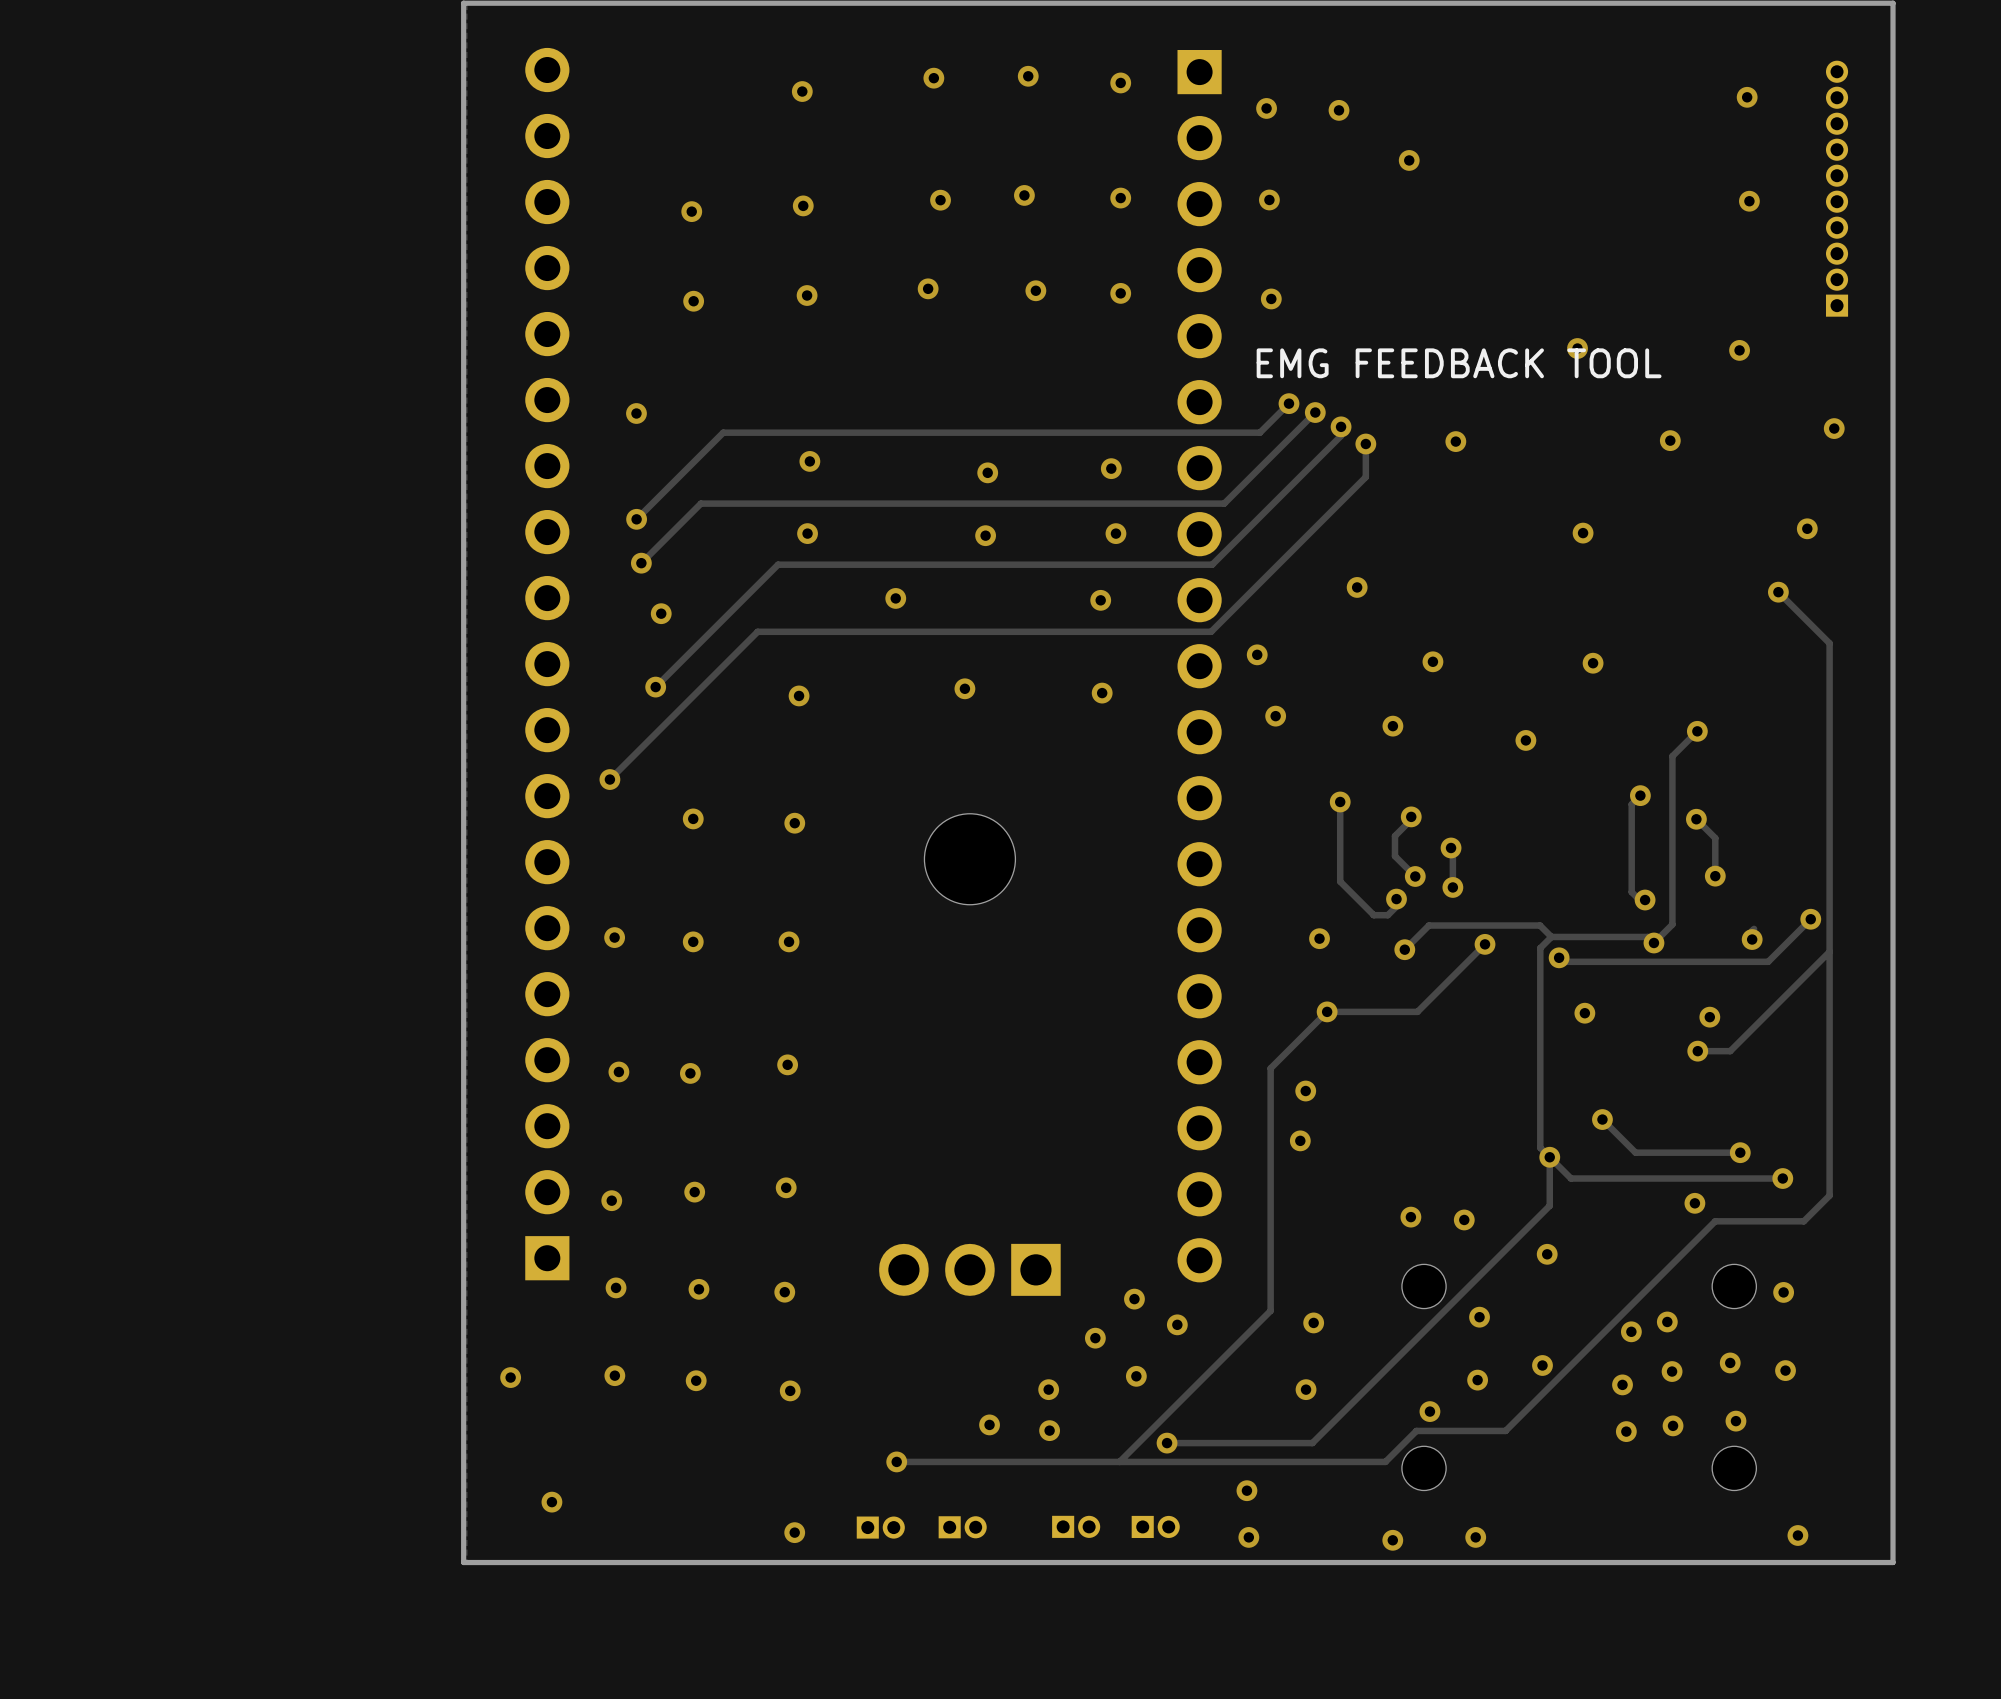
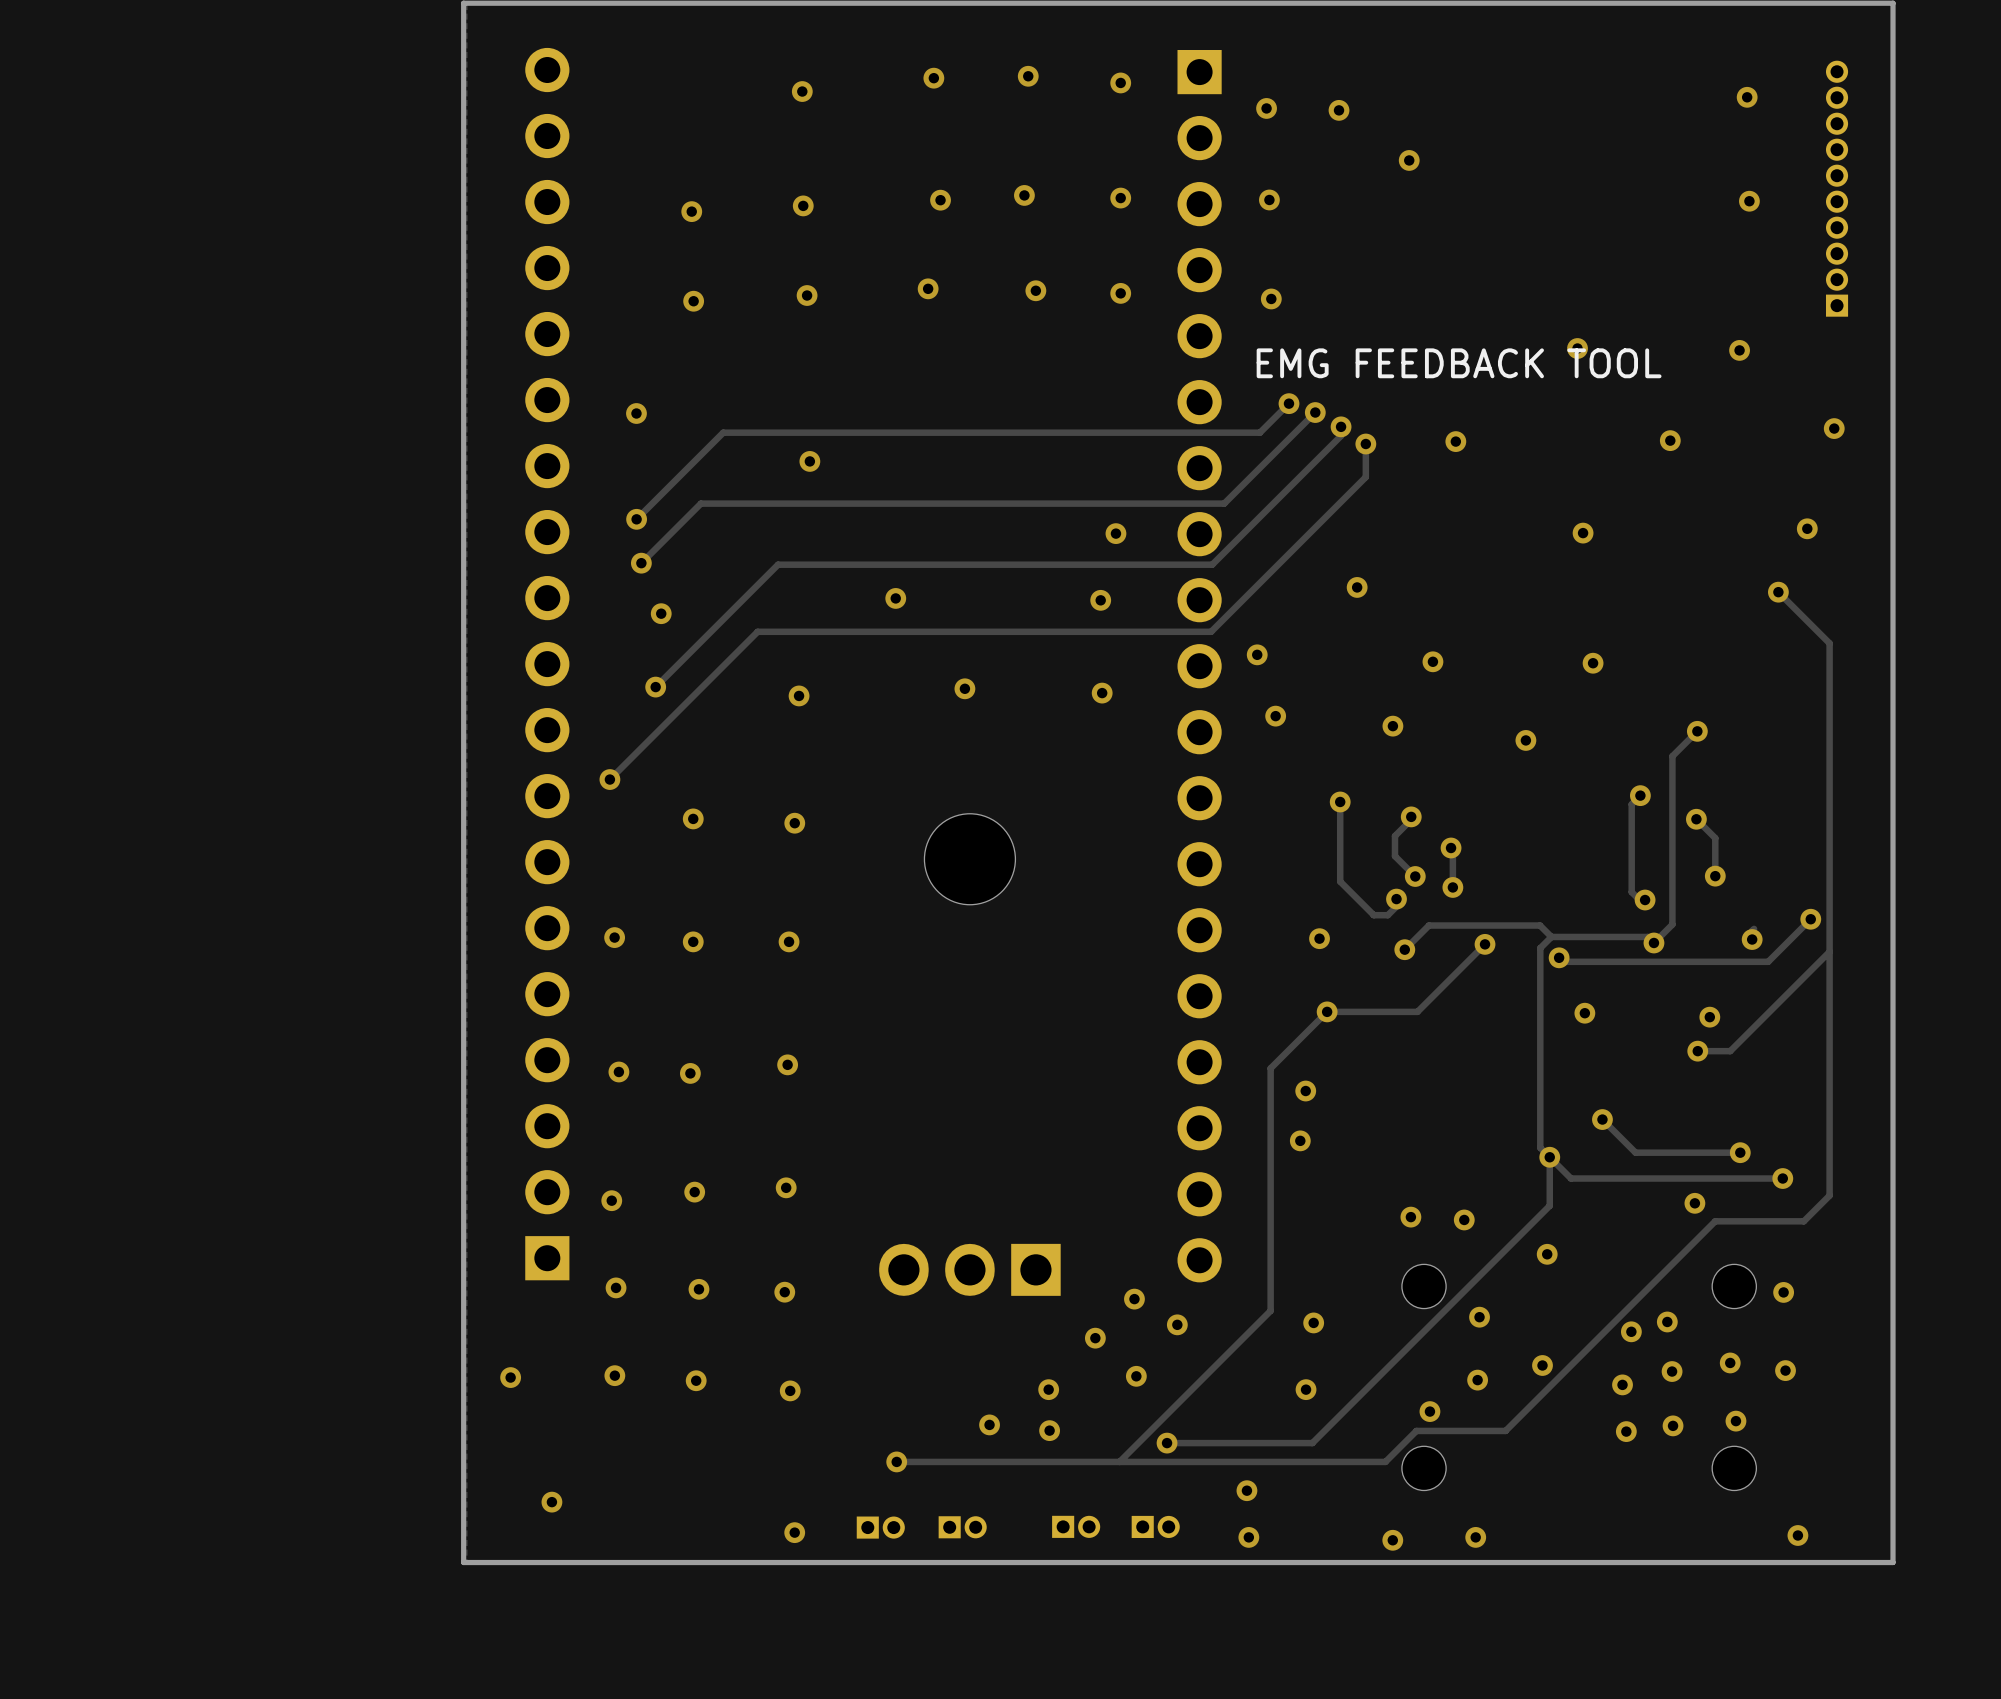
via: (1111, 468) -> none
via: (987, 472) -> none
via: (807, 533) -> none
via: (985, 535) -> none

